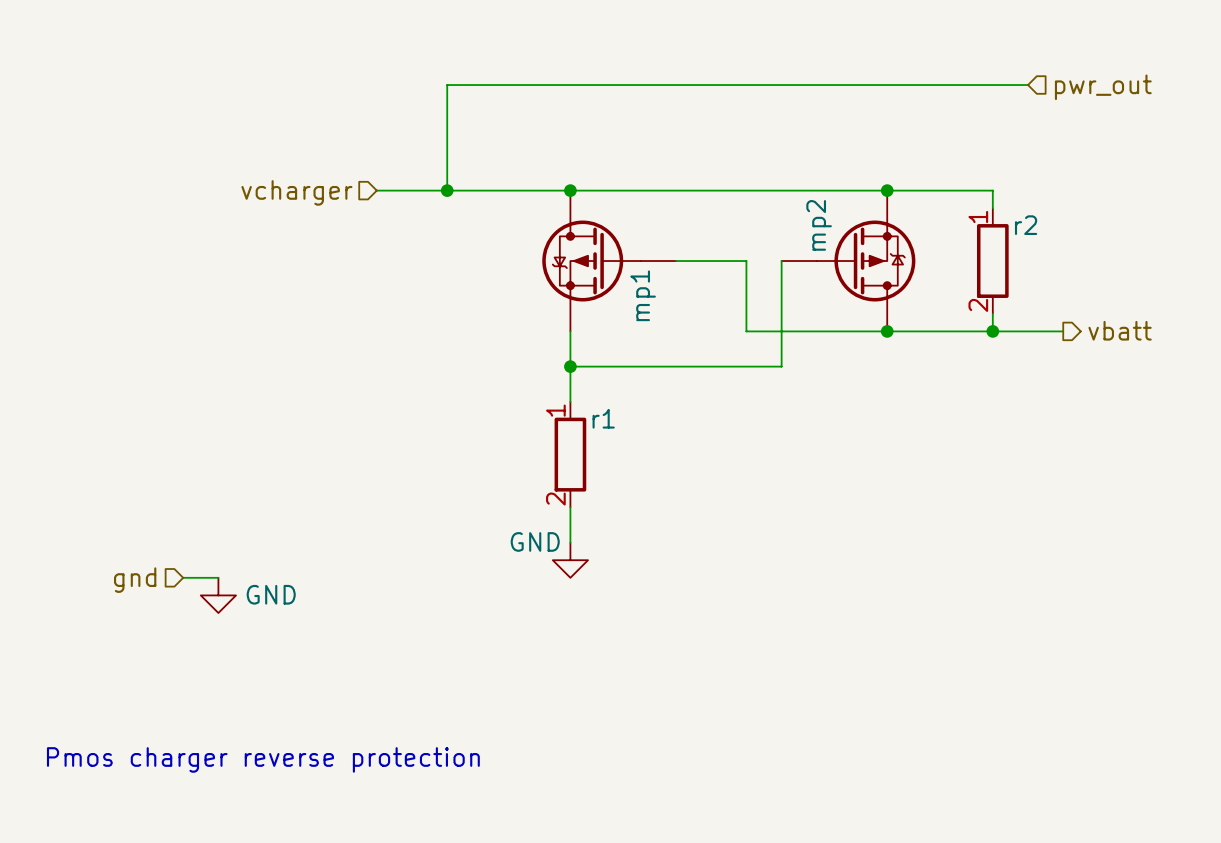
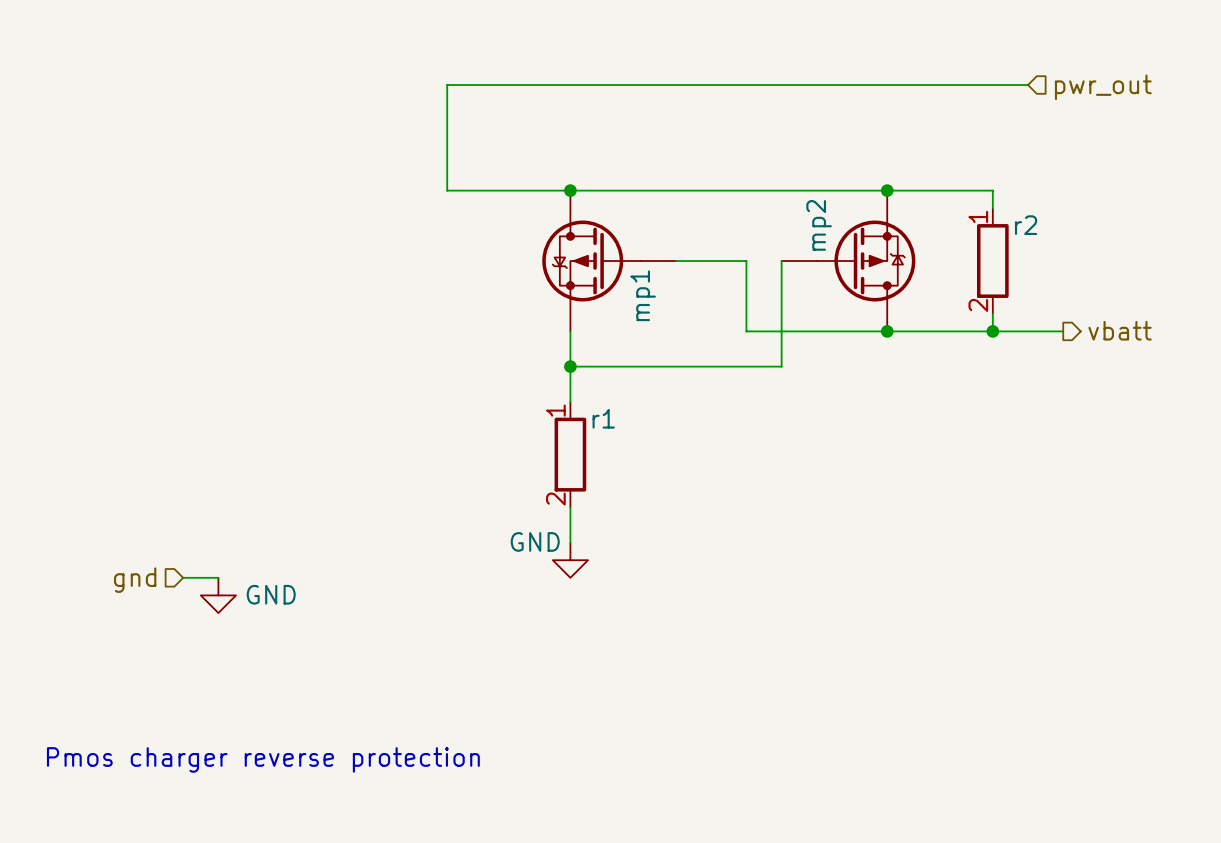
wire: (376, 190) (447, 190) -> none
junction: (447, 190) -> none
hierarchical label: vcharger (296, 192) -> none

